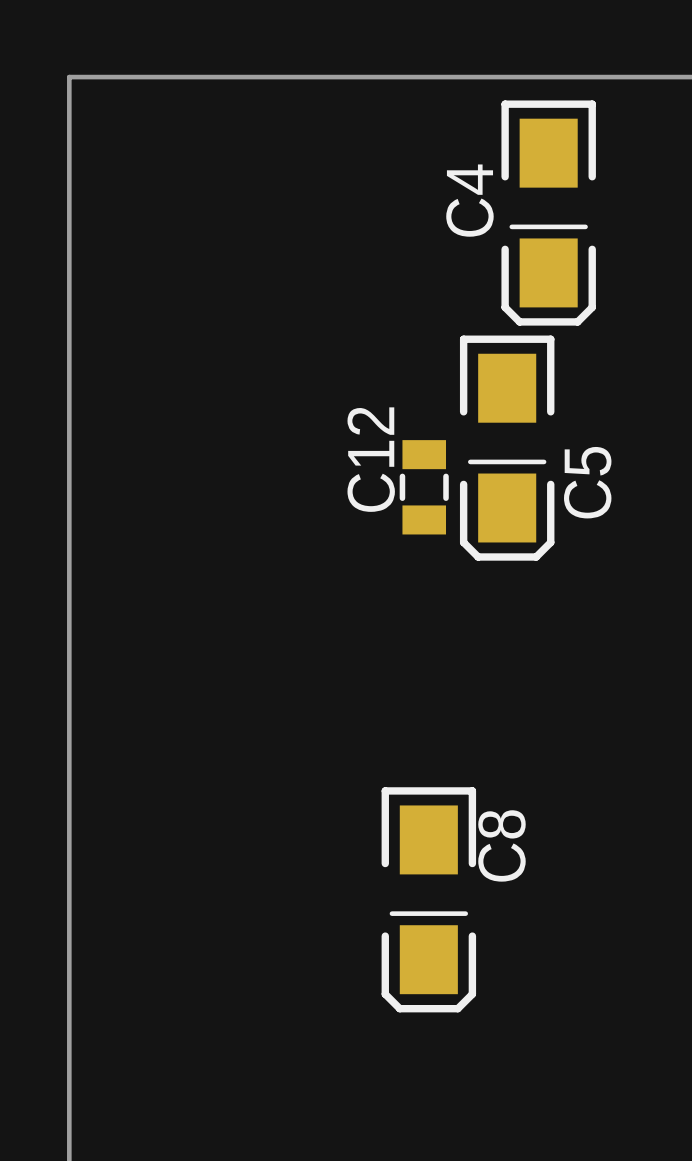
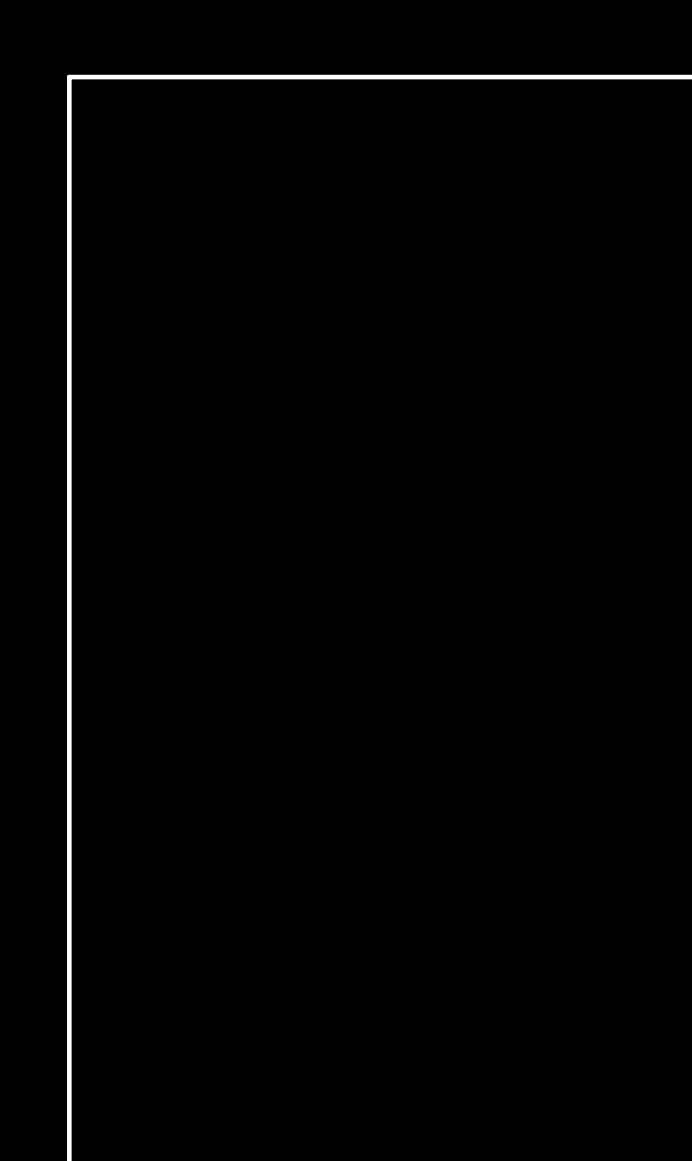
C4: (548, 213) -> none
C5: (507, 448) -> none
C12: (424, 487) -> none
C8: (428, 899) -> none

